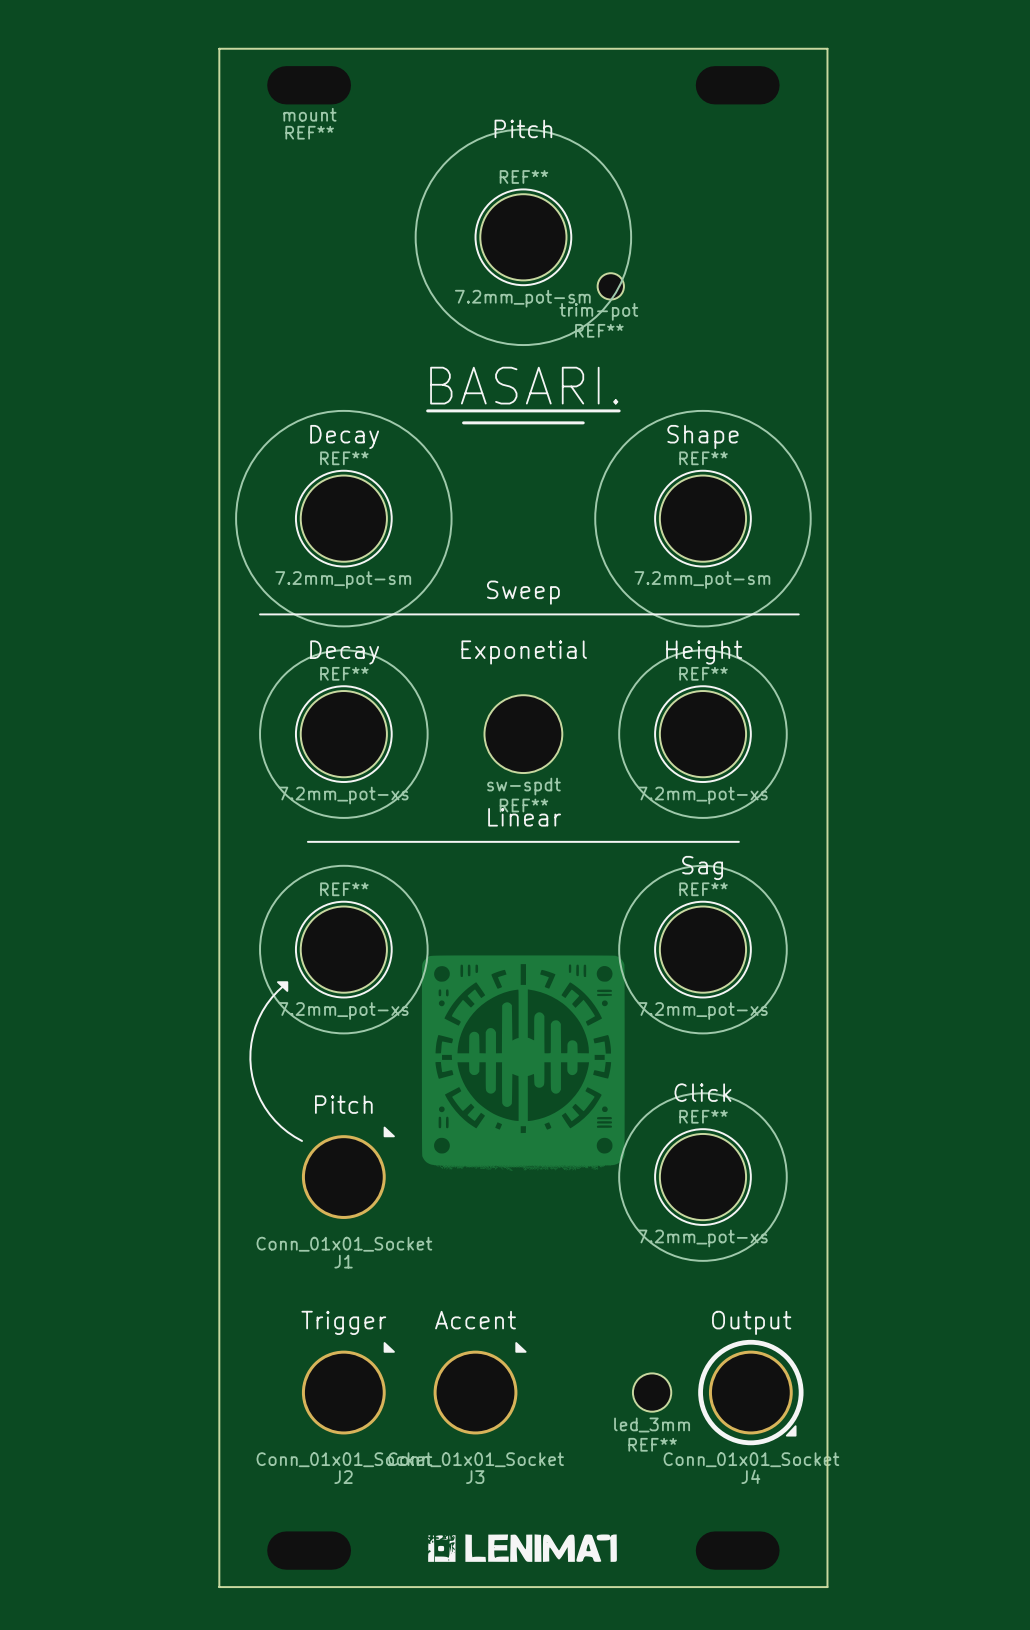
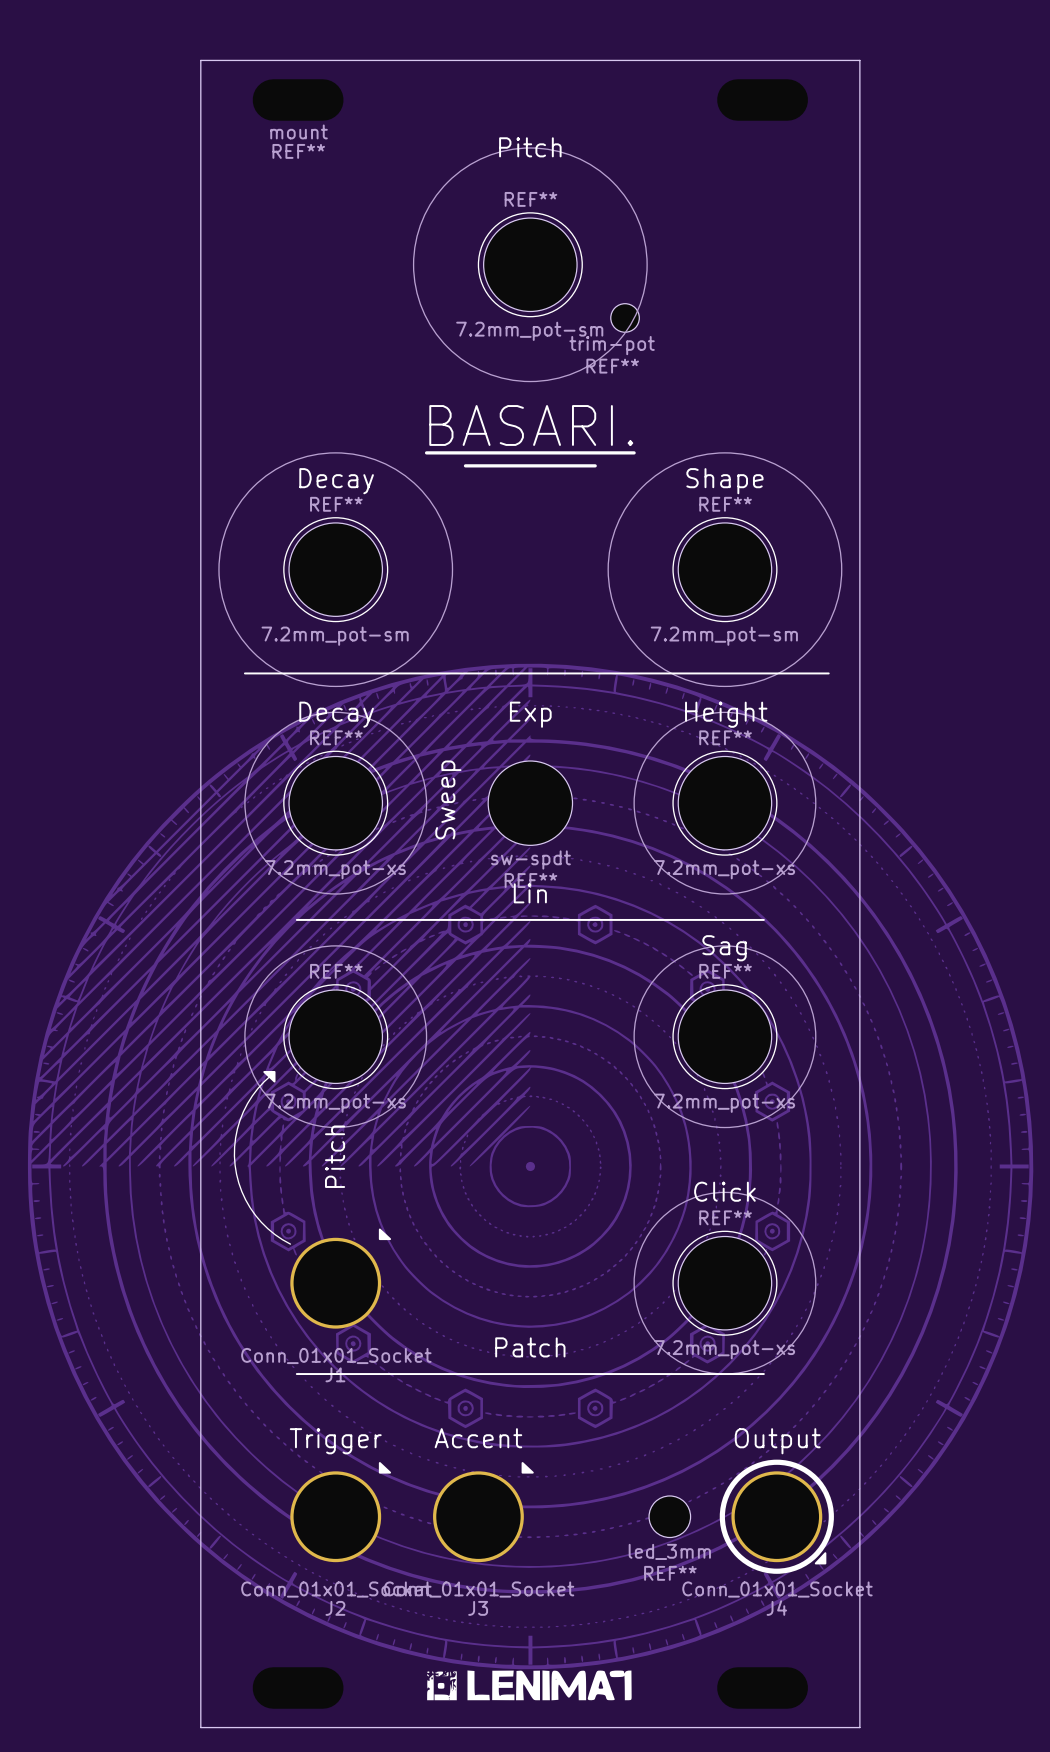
text rotation: 0° (523, 592) -> 90° counterclockwise (448, 799)
text position: Sweep (523, 592) -> Sweep (448, 799)
text: Exponetial (524, 652) -> Exp (530, 714)
text: Linear (524, 817) -> Lin (530, 893)
drawing shape: [421, 955, 625, 1171] -> [27, 663, 1034, 1670]
text rotation: 0° (343, 1104) -> 90° counterclockwise (335, 1156)
text: none -> Patch (530, 1347)
line: none -> (296, 1374) (763, 1374)

